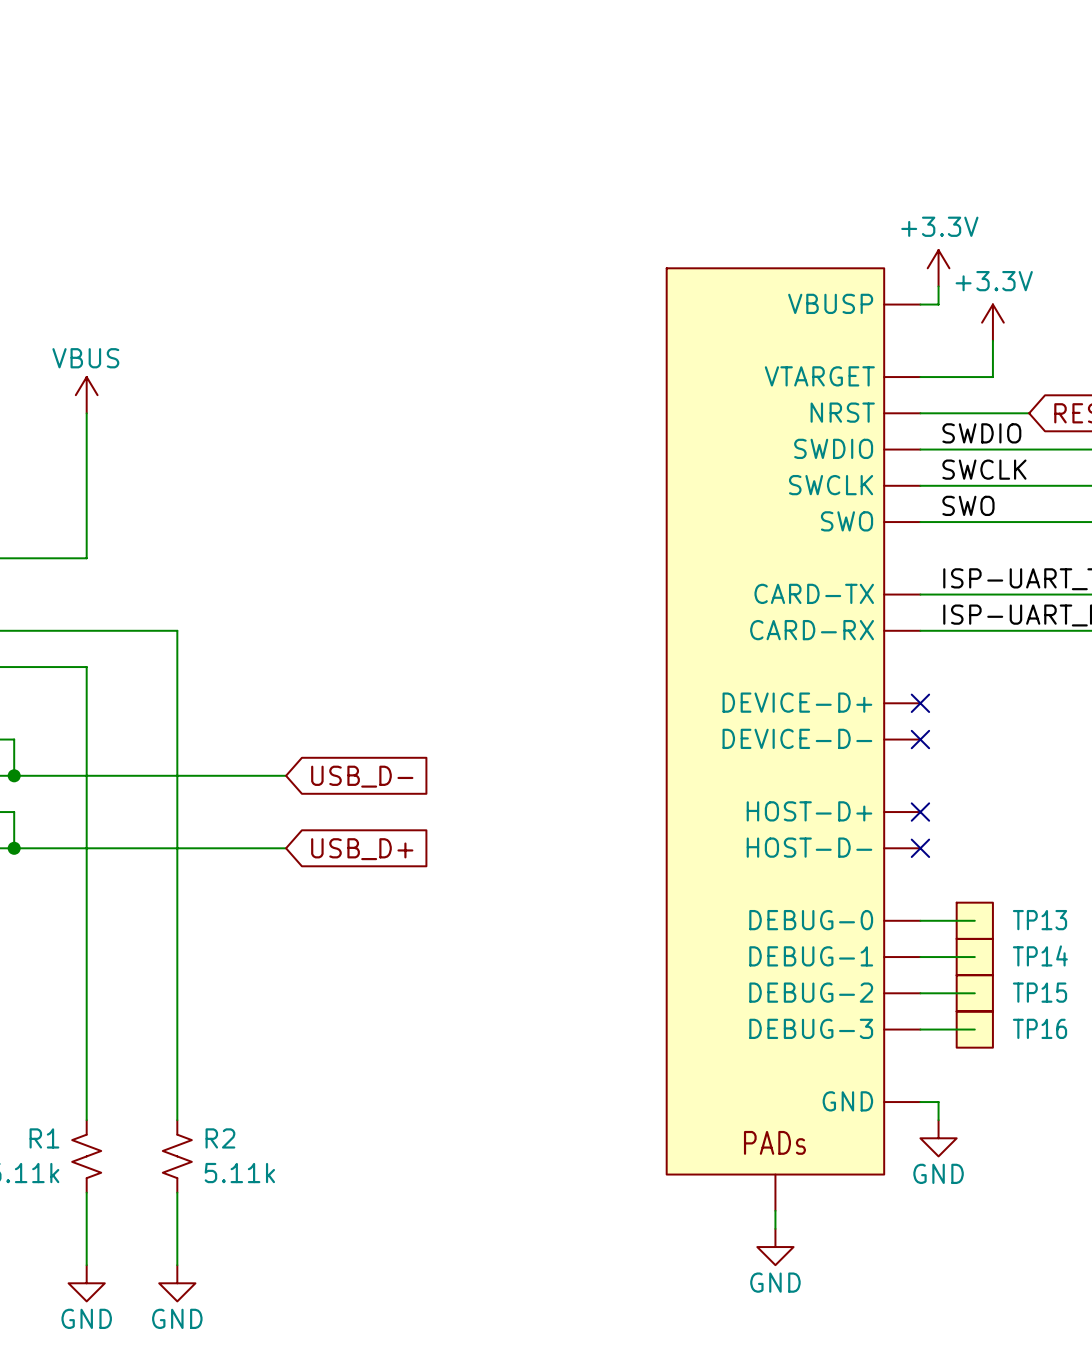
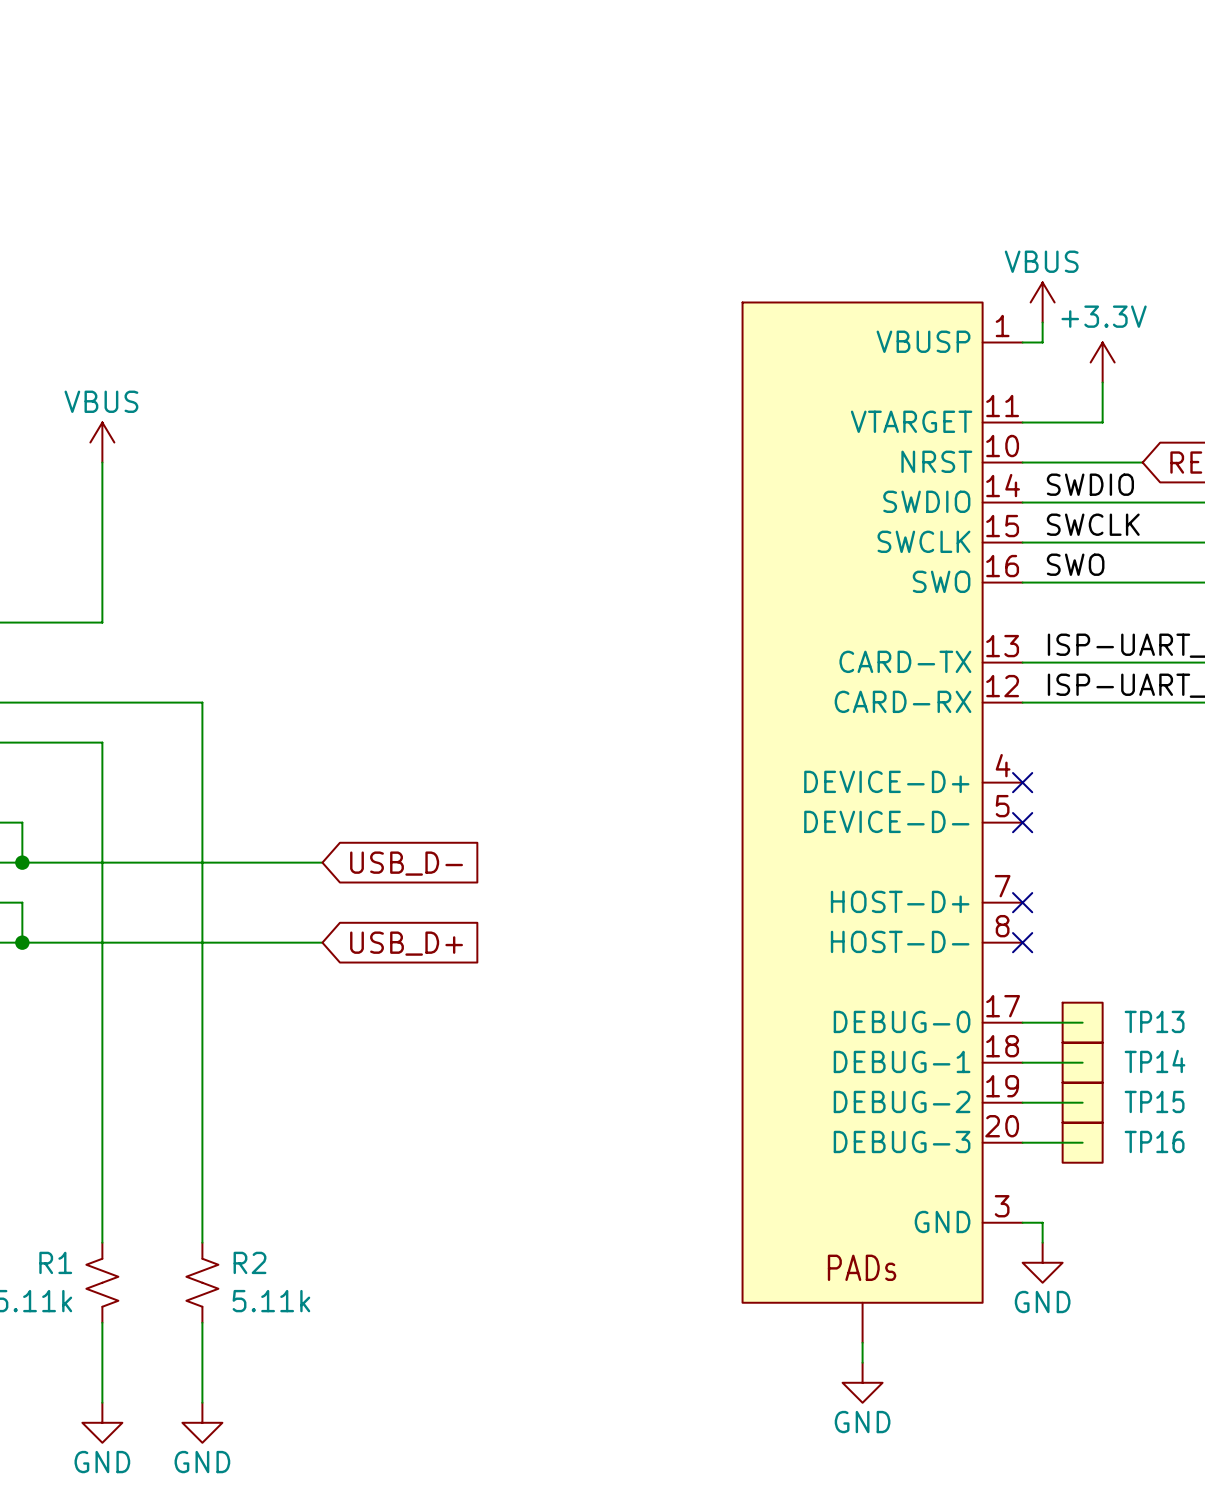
part symbol: [666, 268, 921, 1211] -> [742, 302, 1023, 1343]
power symbol: +3.3V (938, 268) -> VBUS (1042, 302)

